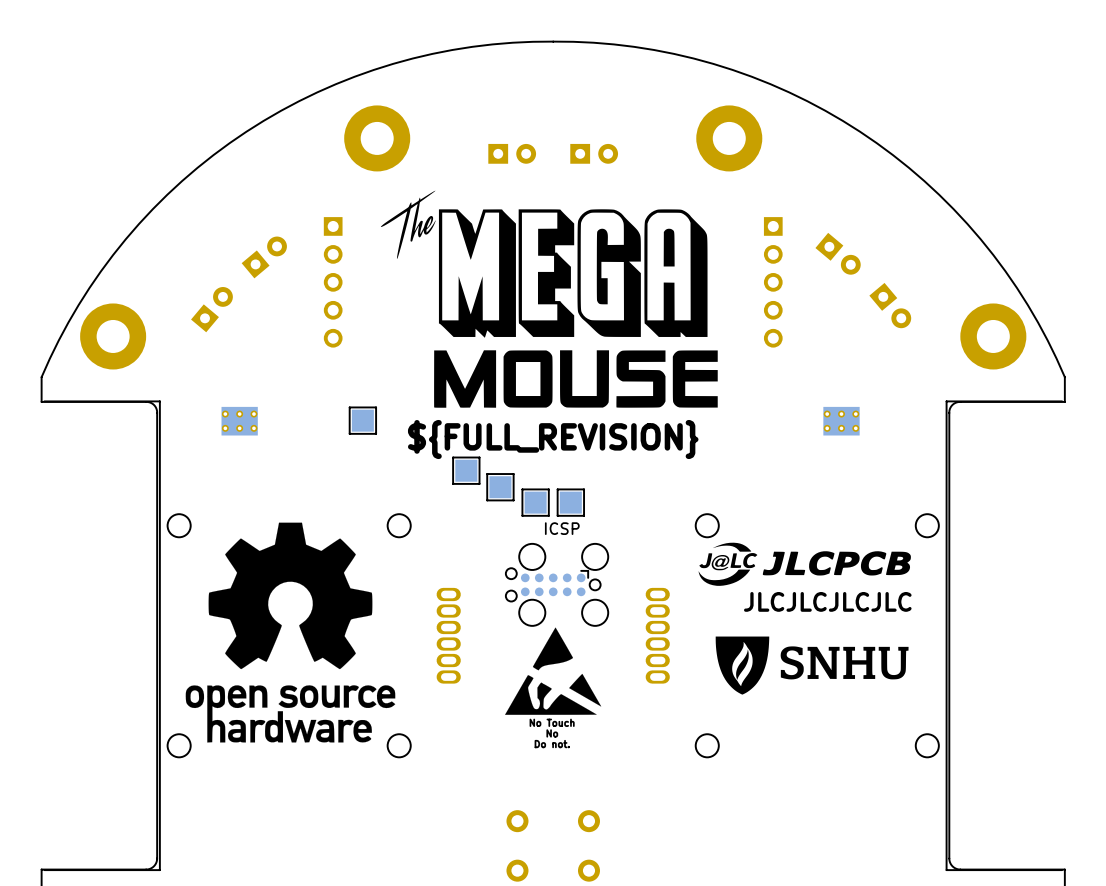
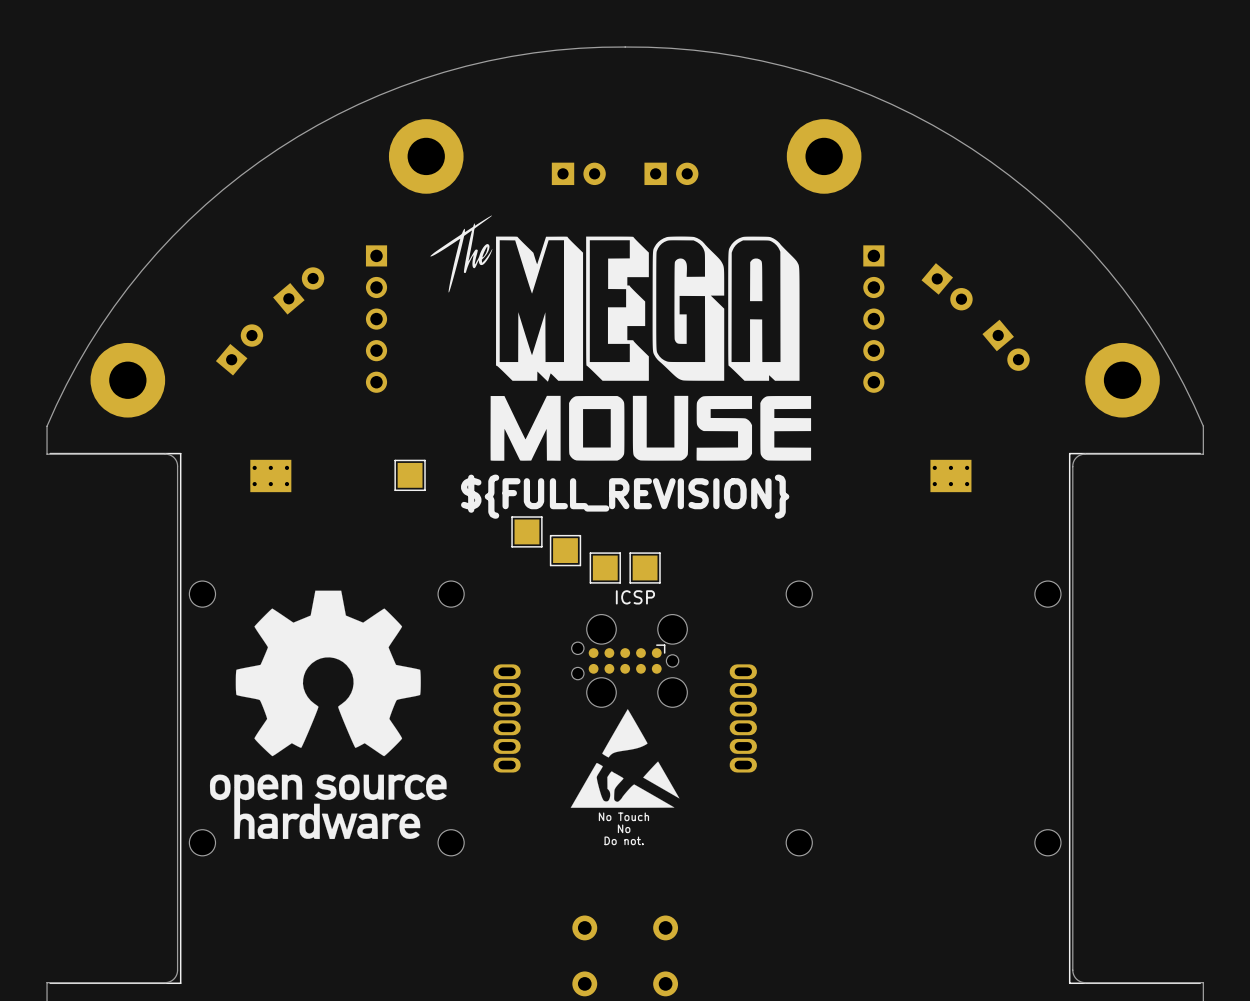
drawing: [698, 542, 911, 586] -> none
text: JLCJLCJLCJLC (827, 601) -> none
drawing: [715, 636, 909, 695] -> none

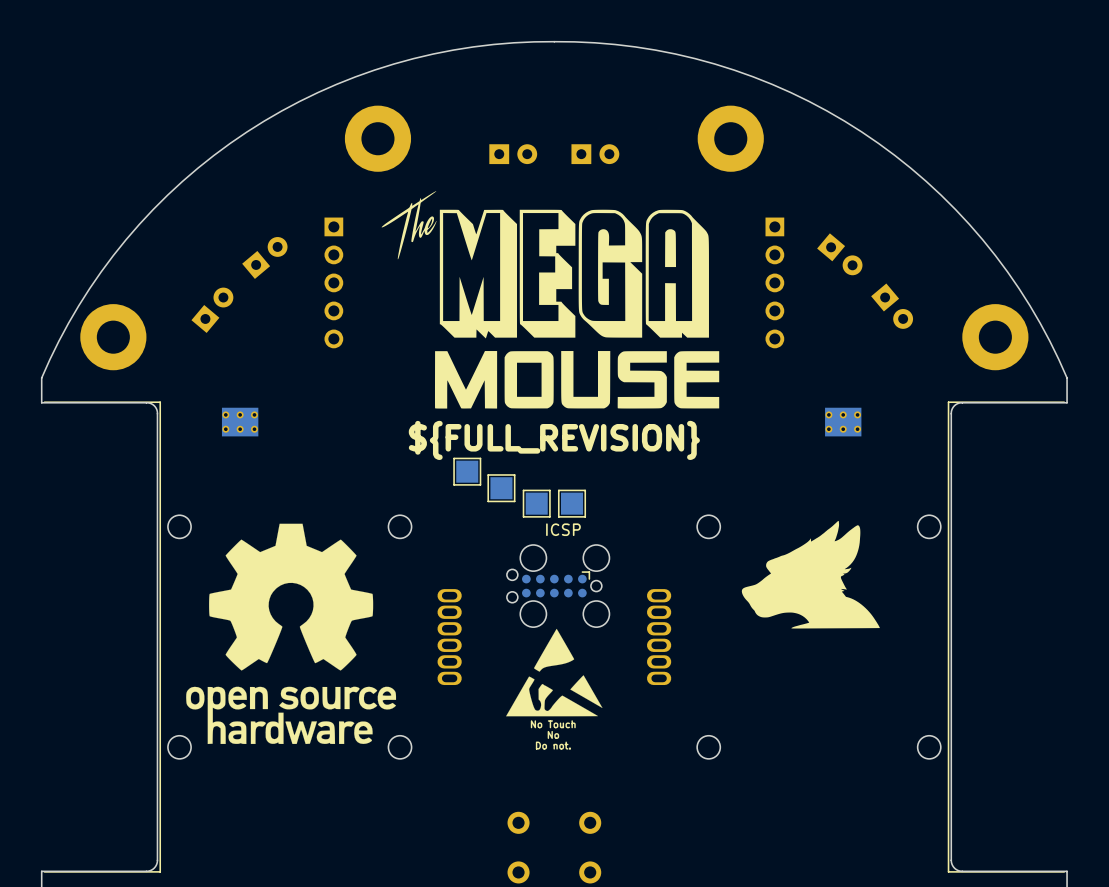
part: (410, 475) -> none
part: none -> (810, 574)

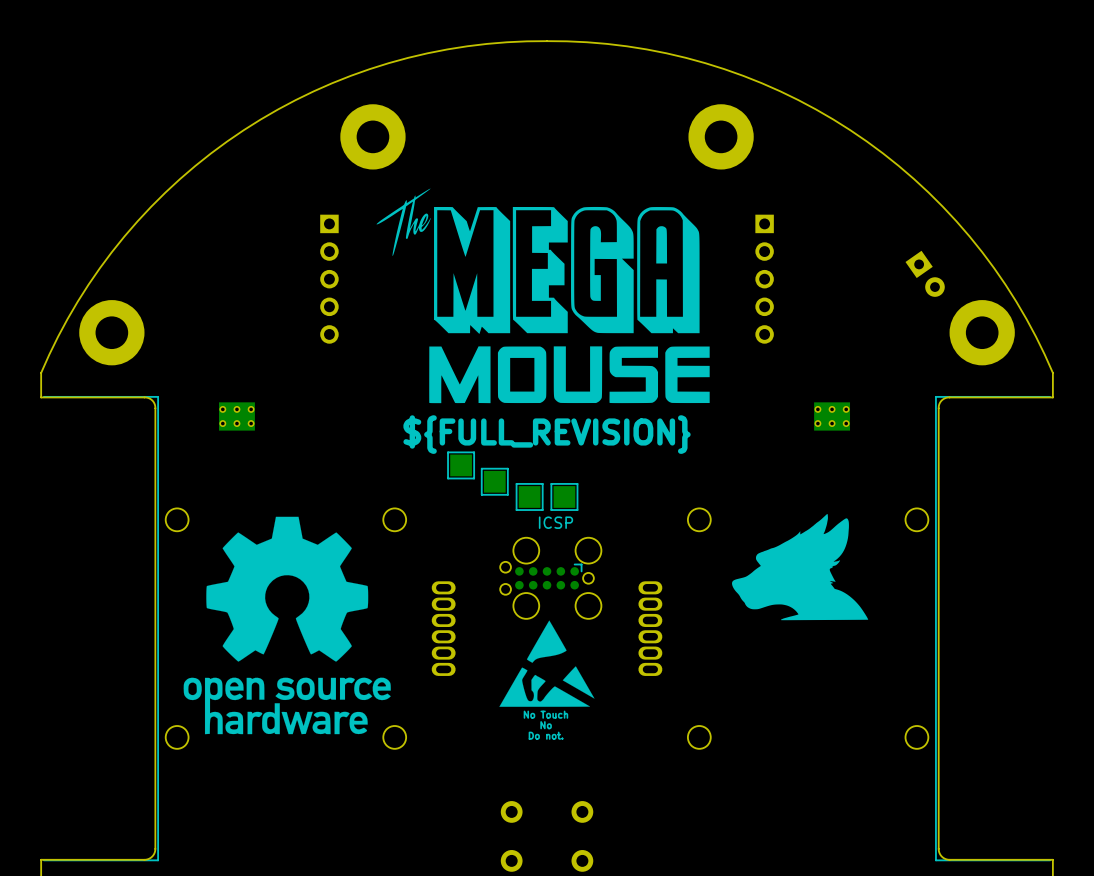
part: (513, 154) -> none
part: (595, 154) -> none
part: (839, 254) -> none
part: (264, 257) -> none
part: none -> (925, 273)
part: (892, 306) -> none
part: (212, 310) -> none

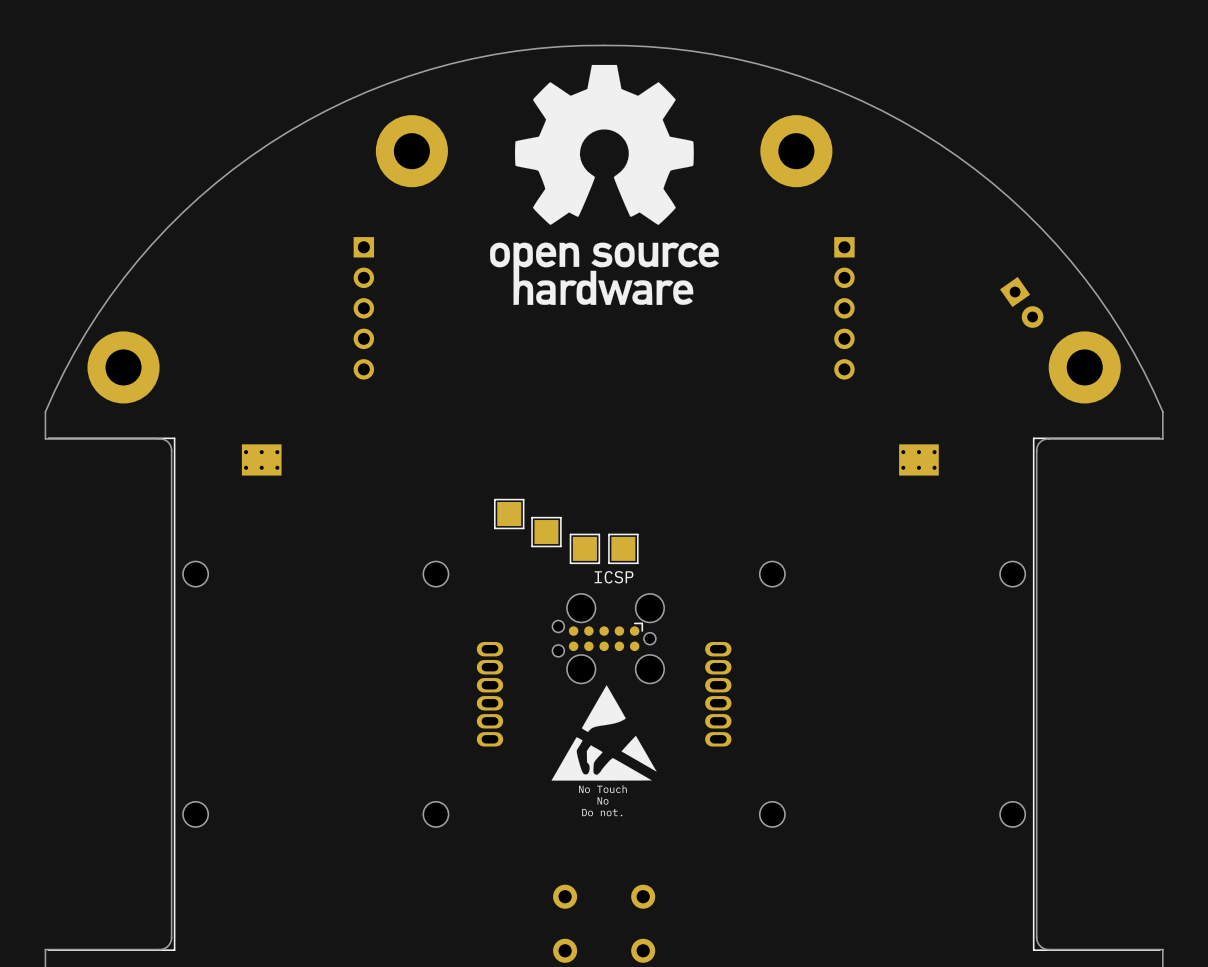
drawing: none -> [490, 64, 719, 306]
drawing: [376, 188, 710, 404] -> none
text: ${FULL_REVISION} (547, 434) -> none
drawing: [183, 516, 391, 735] -> none
part: (800, 567) -> none

